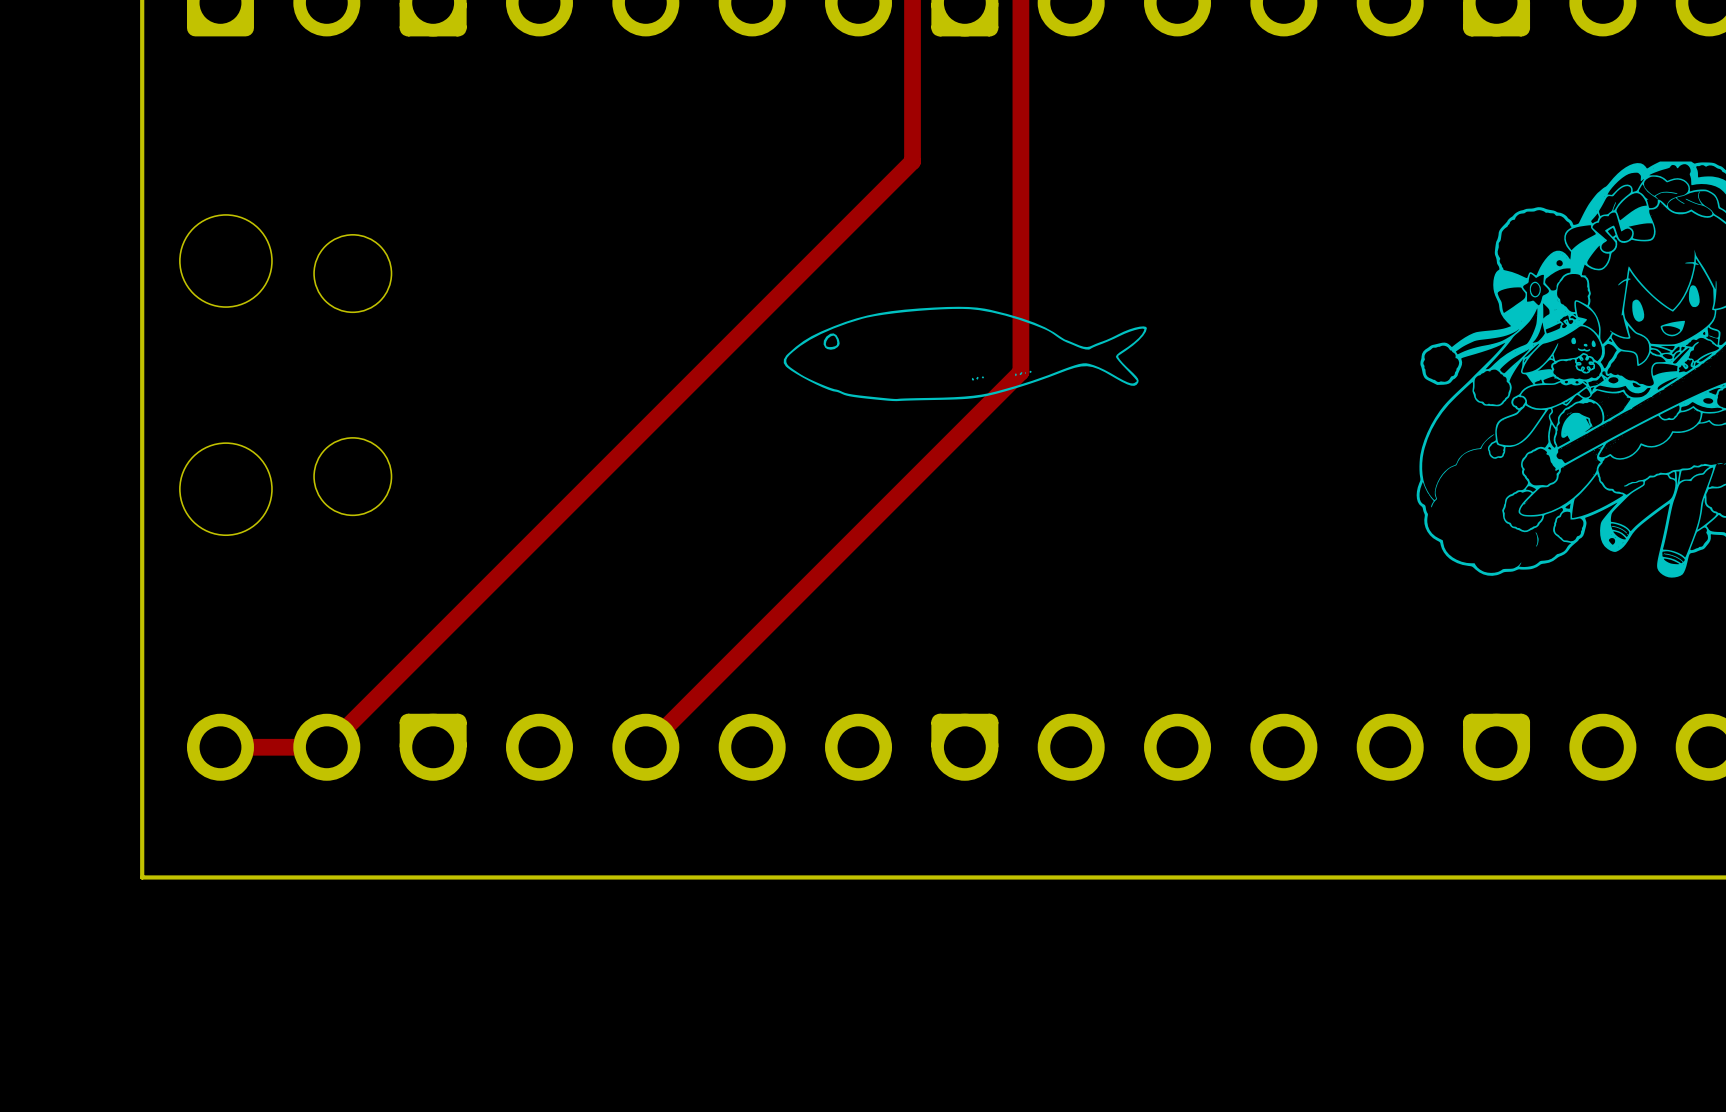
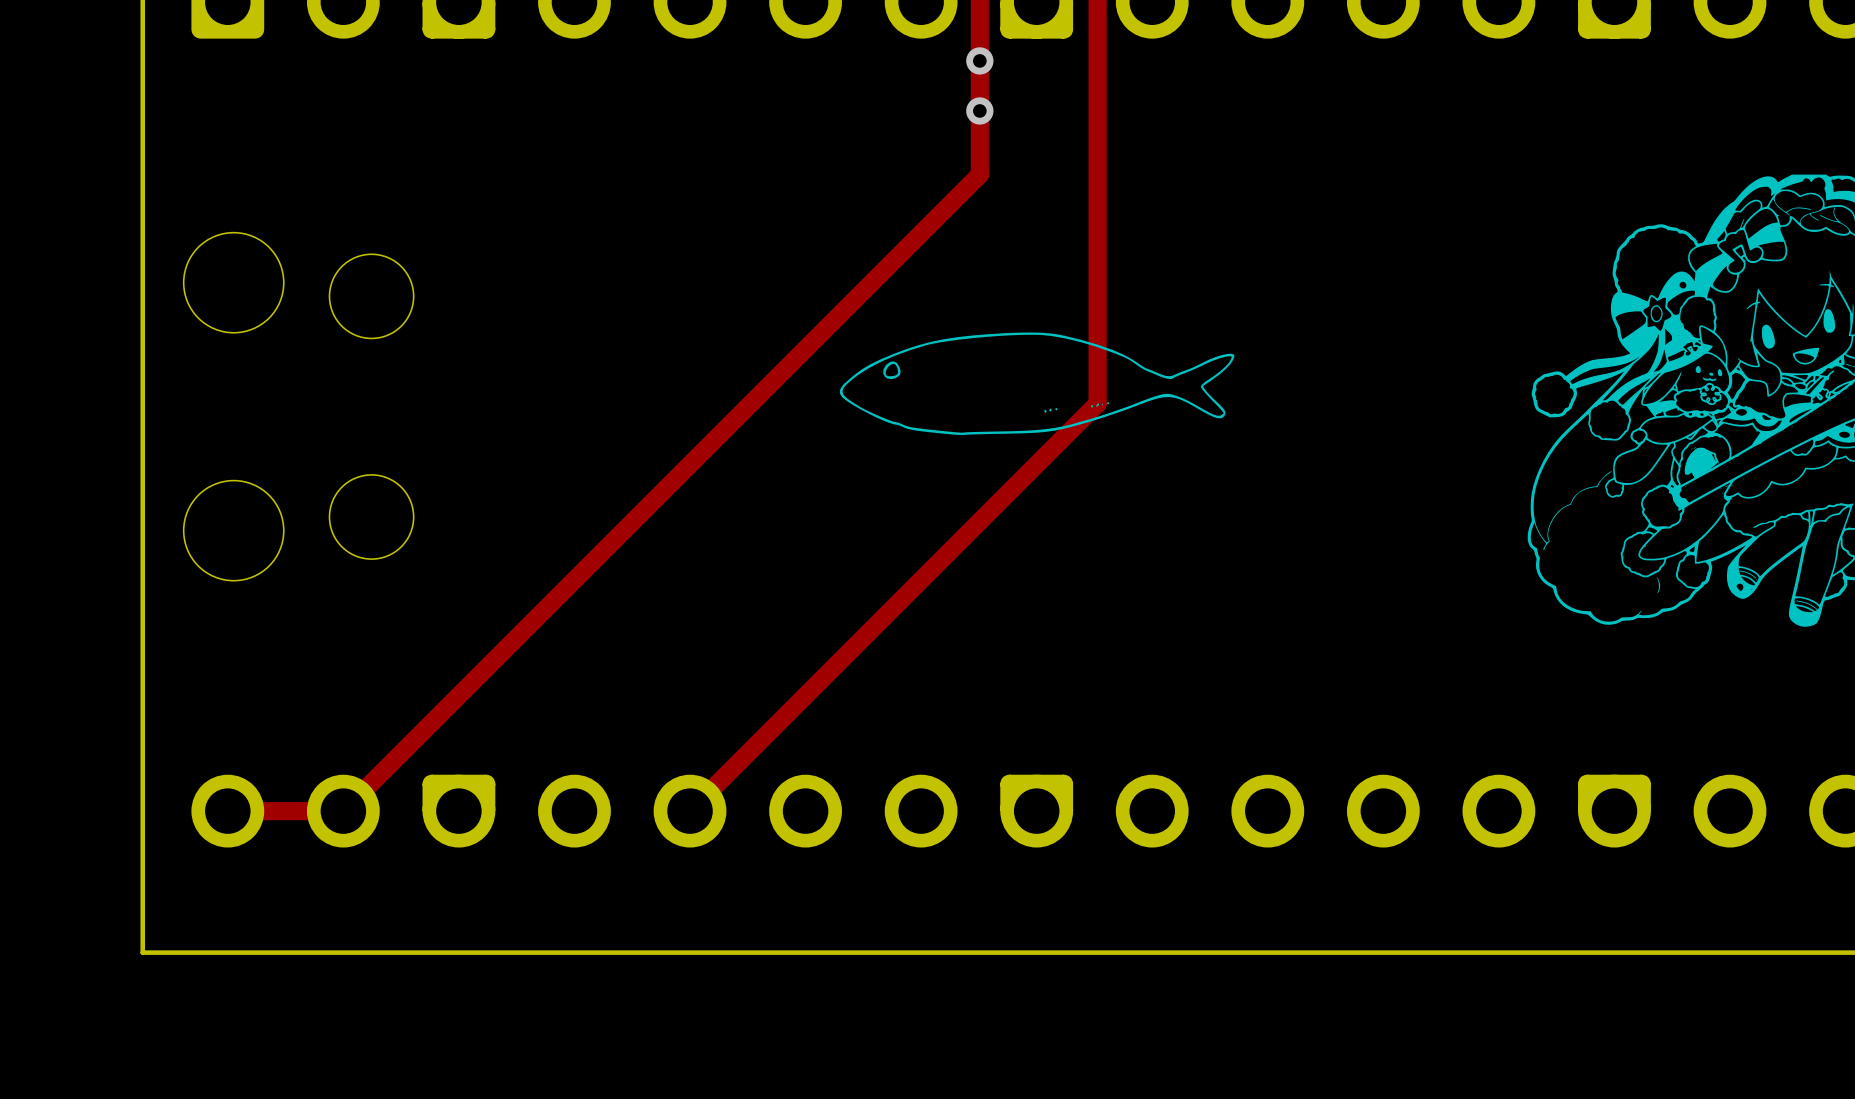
via: none -> (979, 60)
via: none -> (979, 110)

